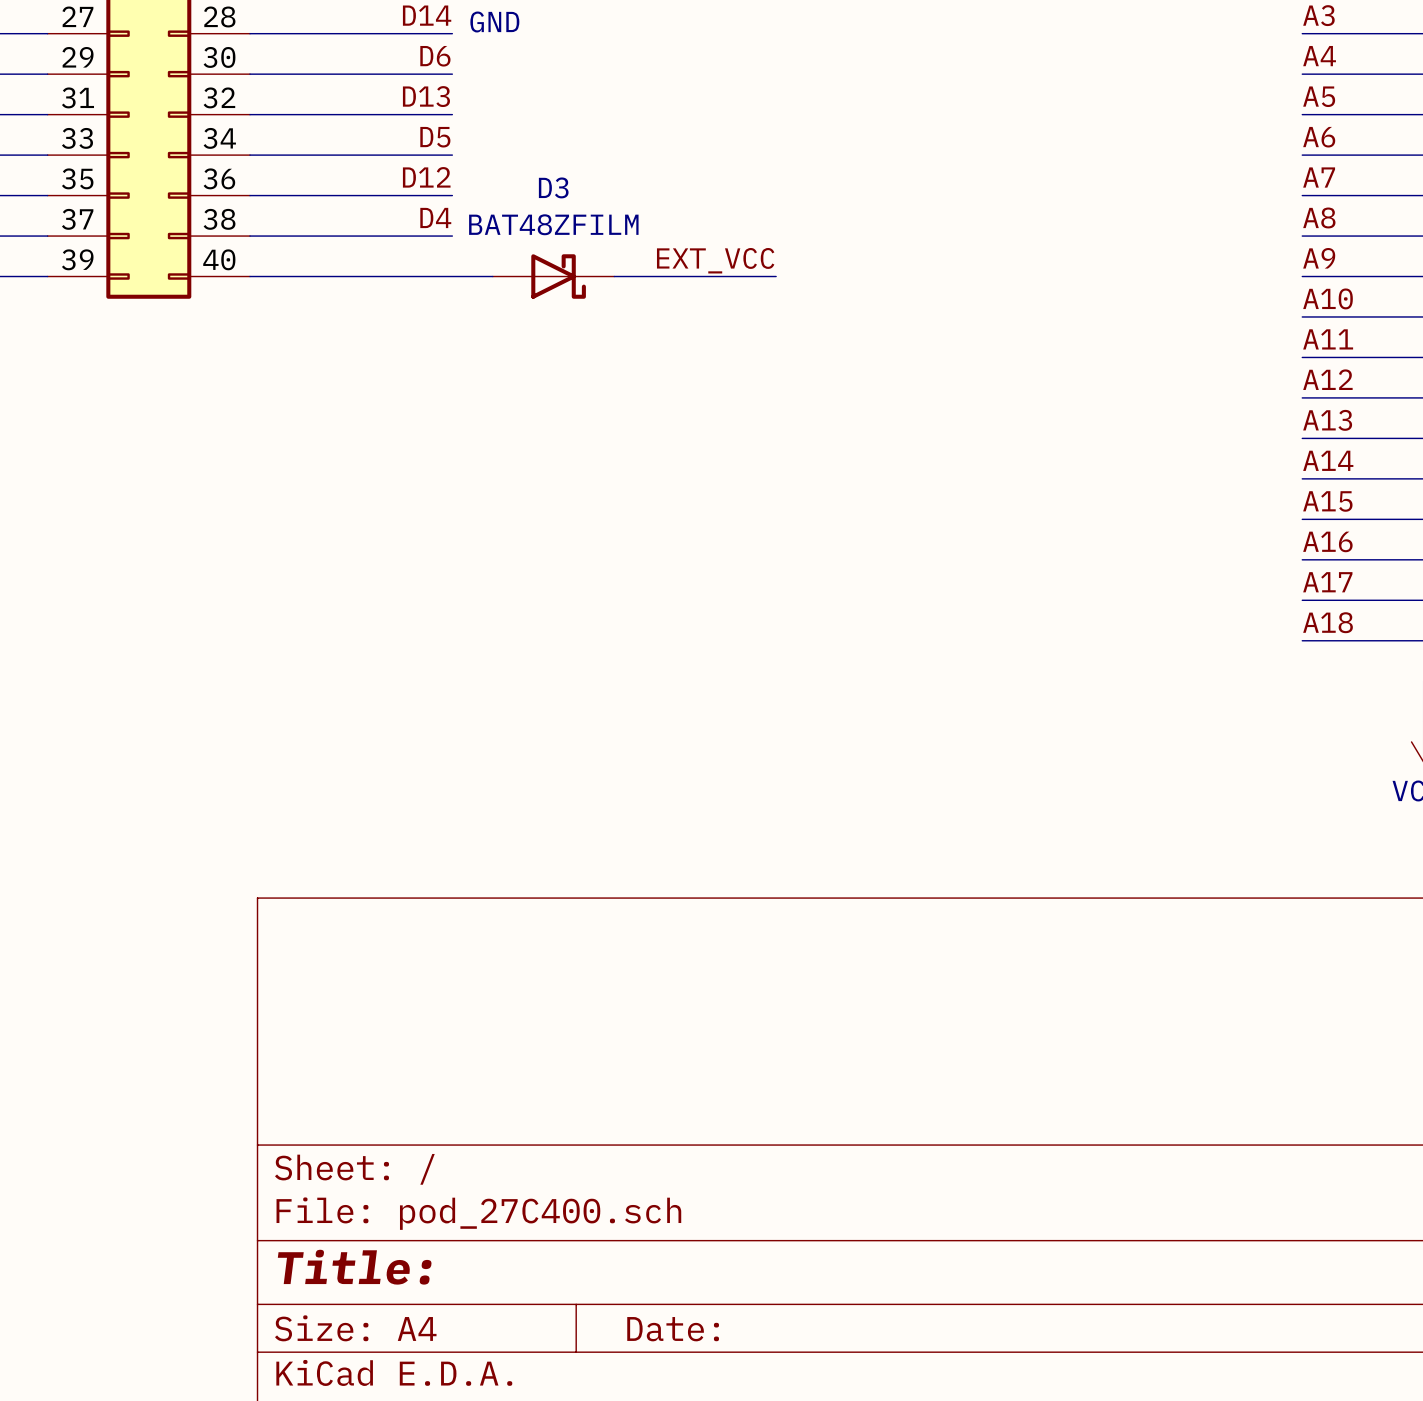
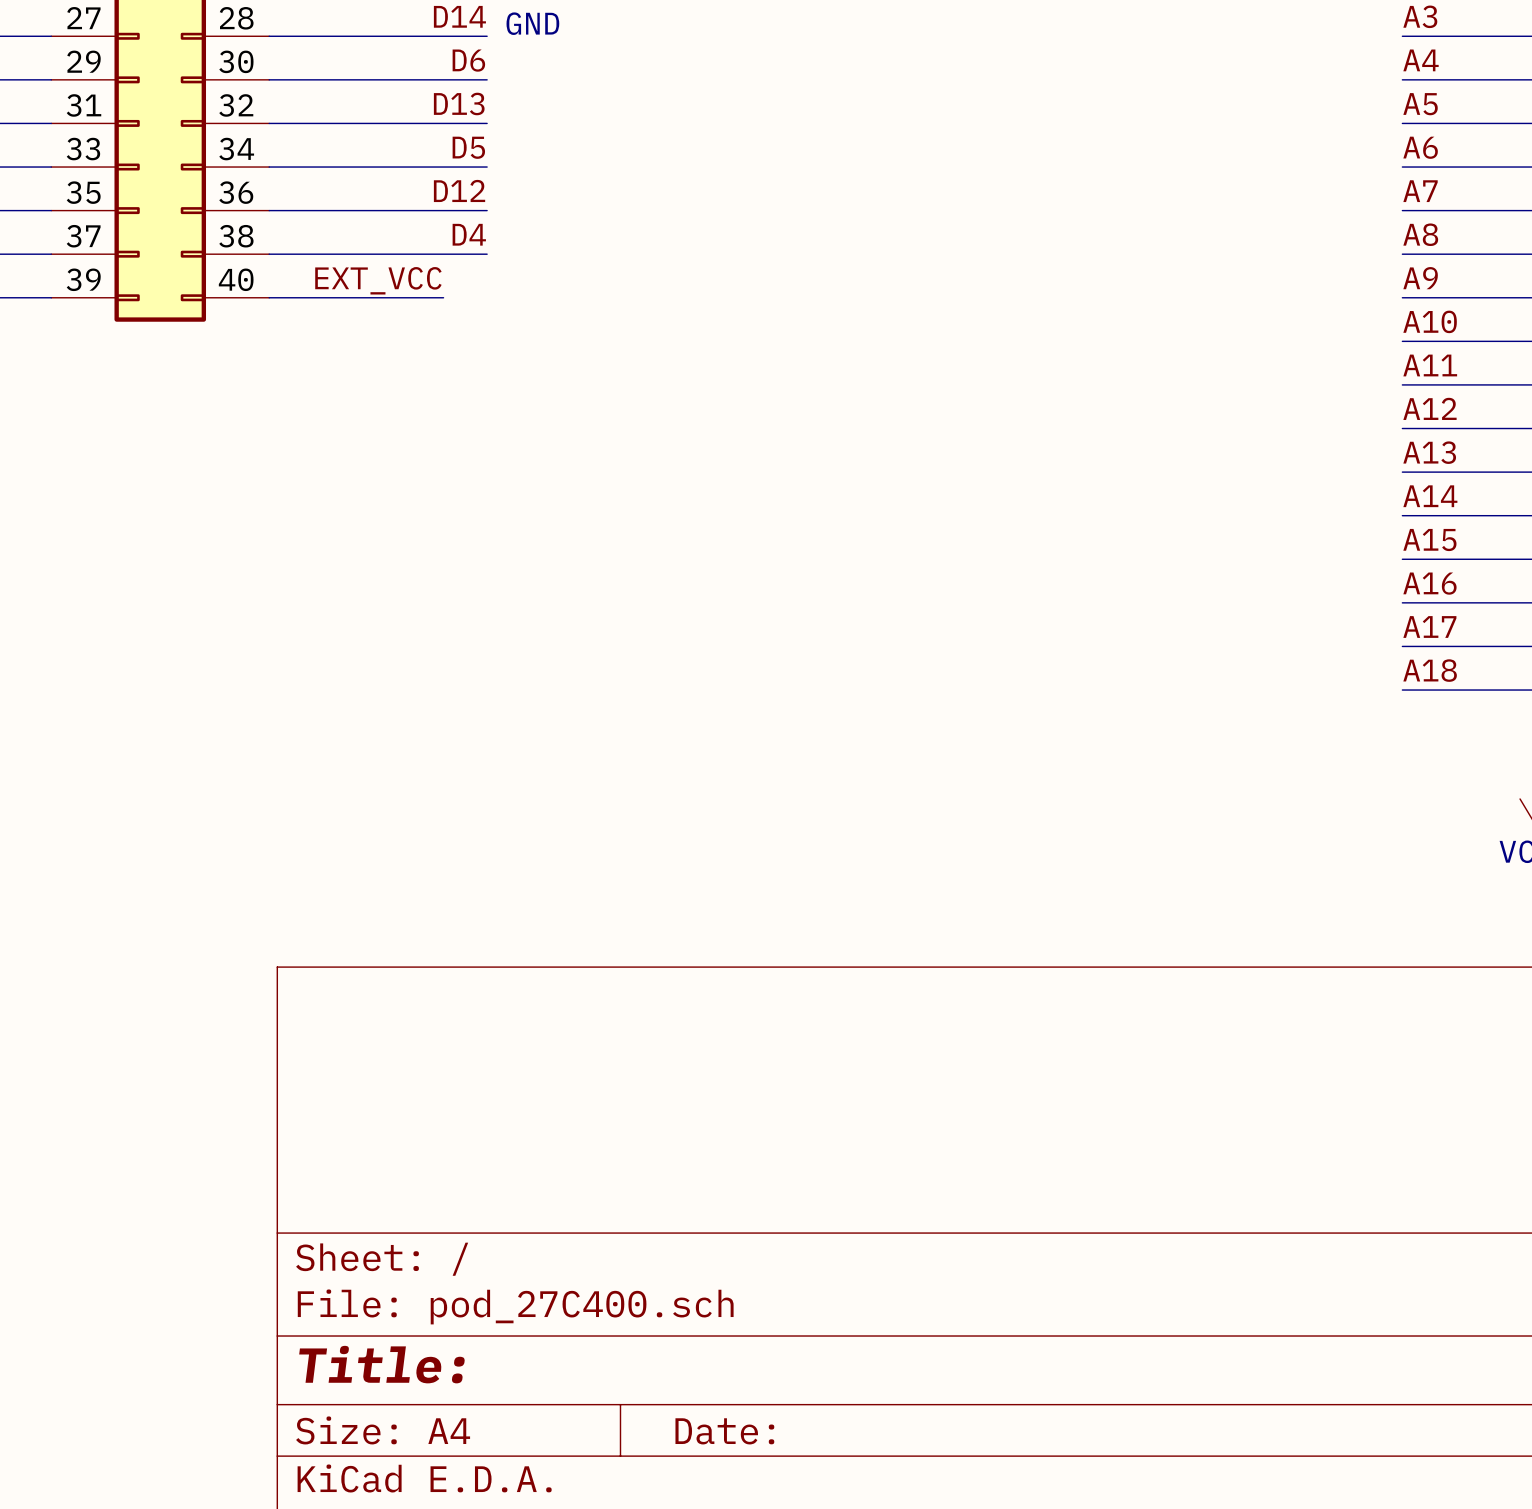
label position: EXT_VCC (715, 260) -> EXT_VCC (378, 280)
wire: (411, 276) (492, 276) -> none
D3: BAT48ZFILM (553, 276) -> none
wire: (614, 276) (776, 276) -> none

